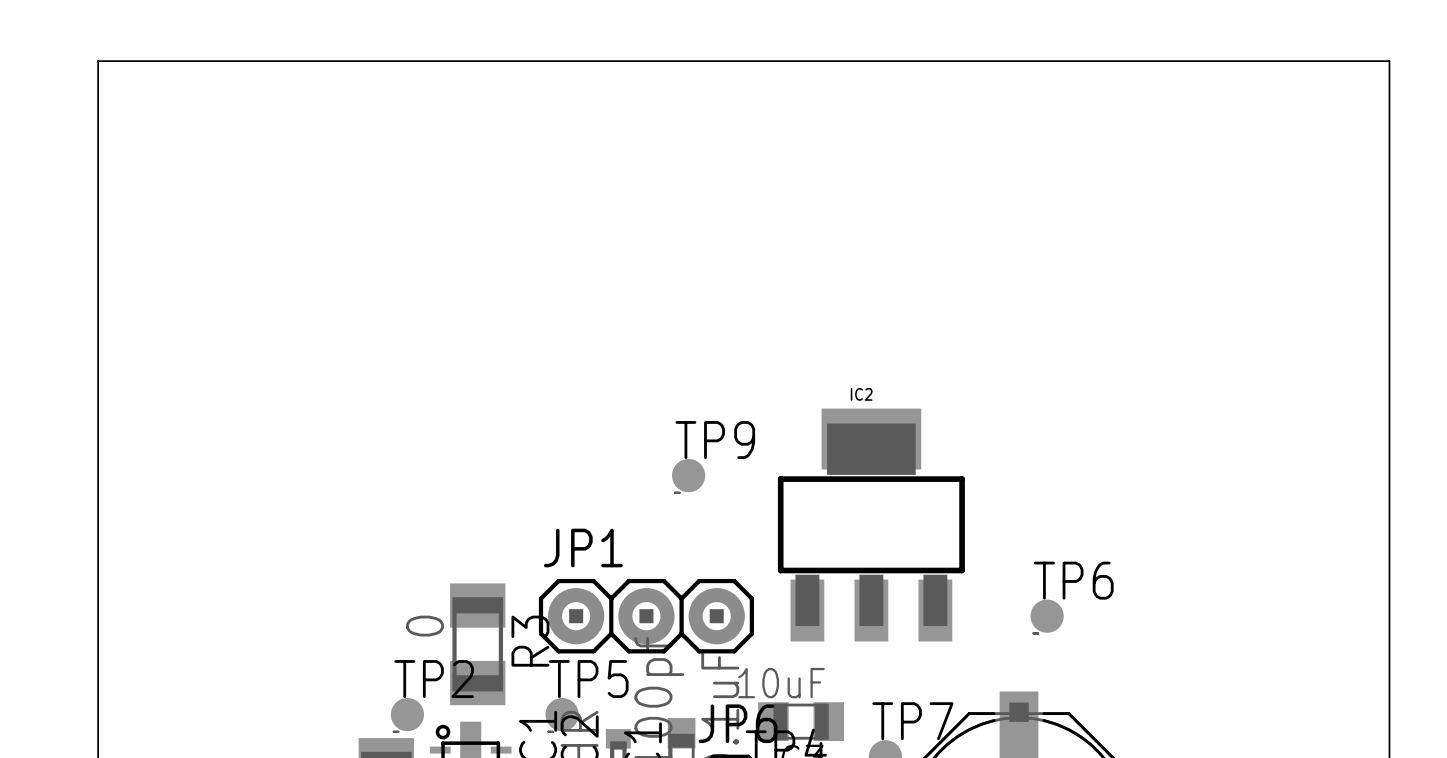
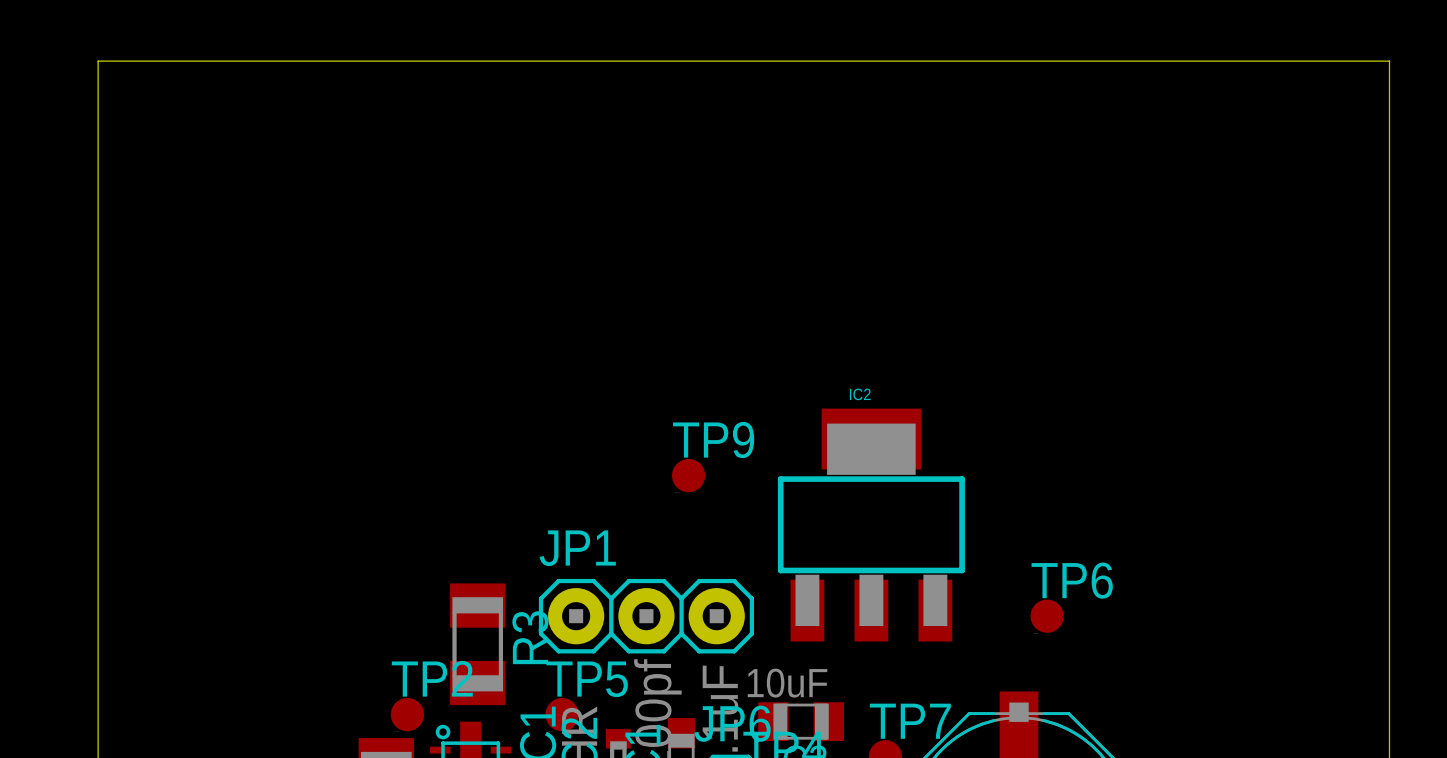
R3 value: 0 (425, 626) -> none

